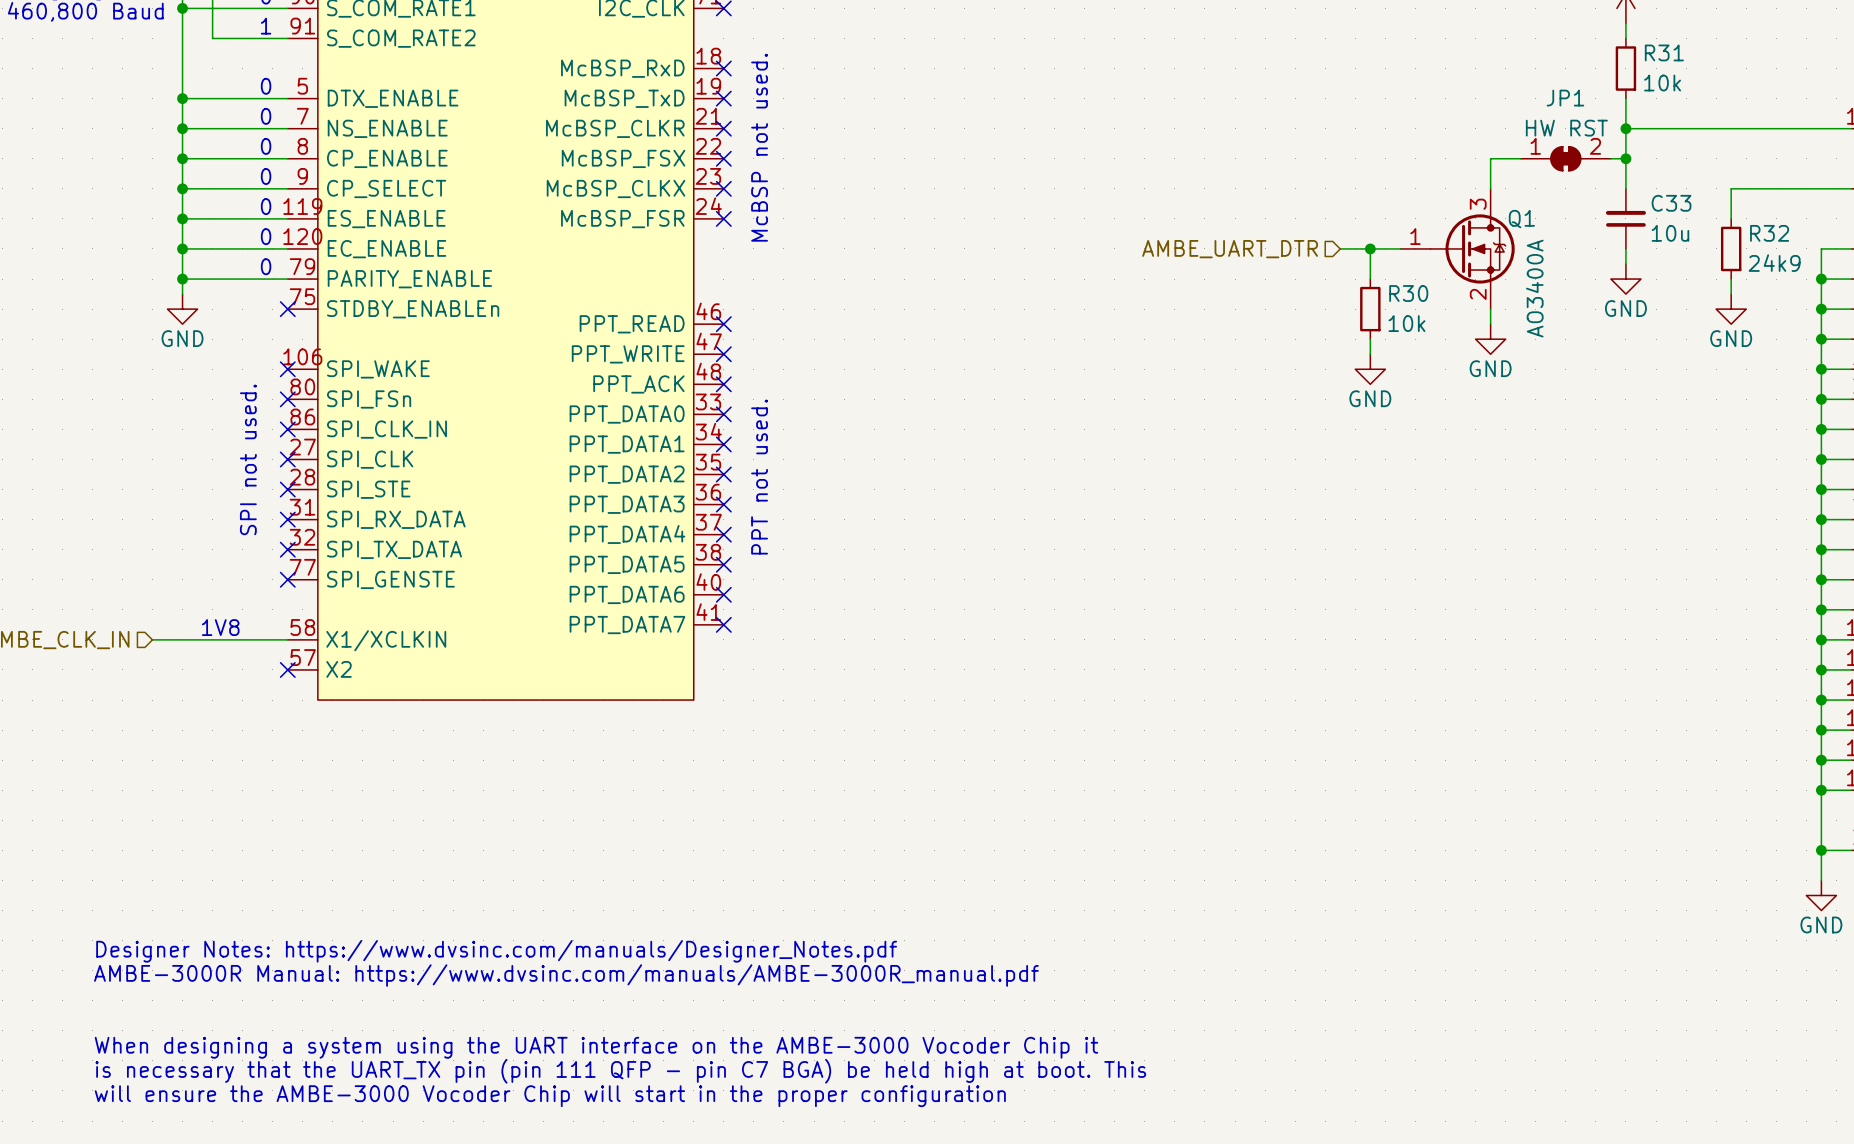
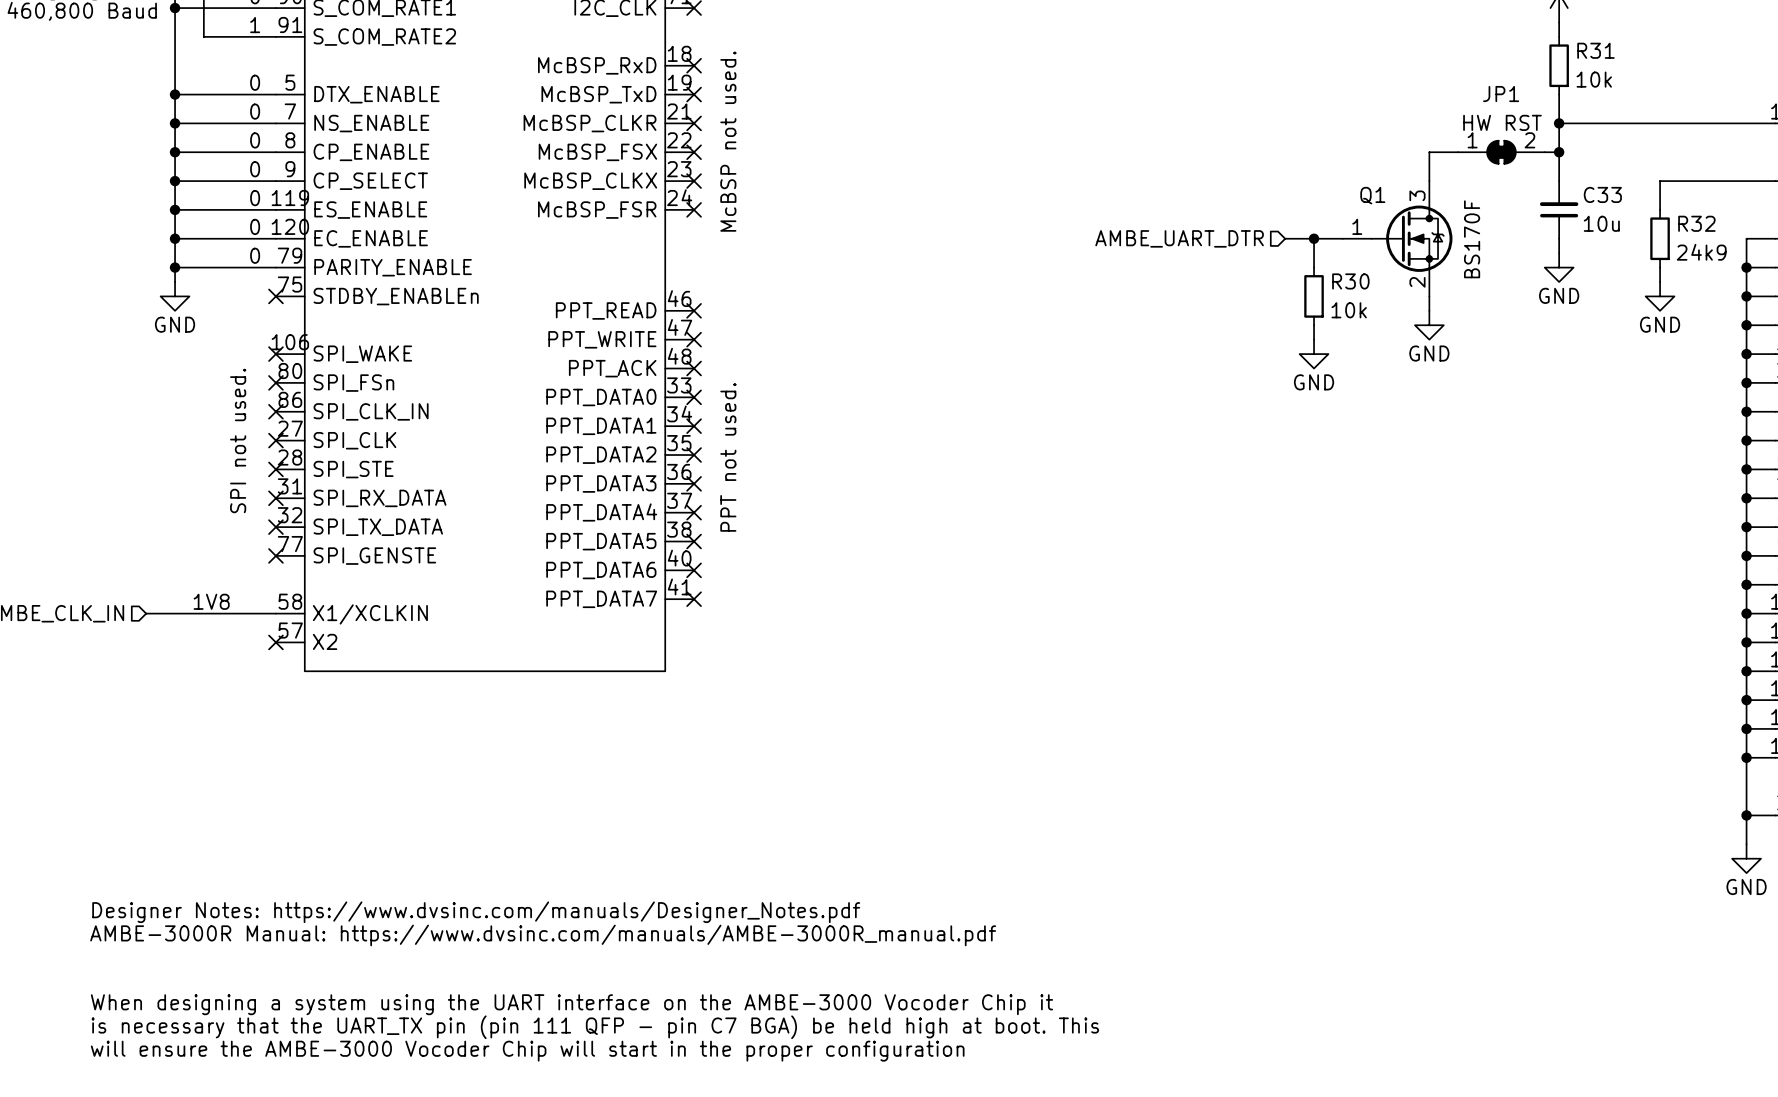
Q1 name position: Q1 (1521, 219) -> Q1 (1372, 195)
Q1 value: AO3400A (1534, 288) -> BS170F (1472, 239)

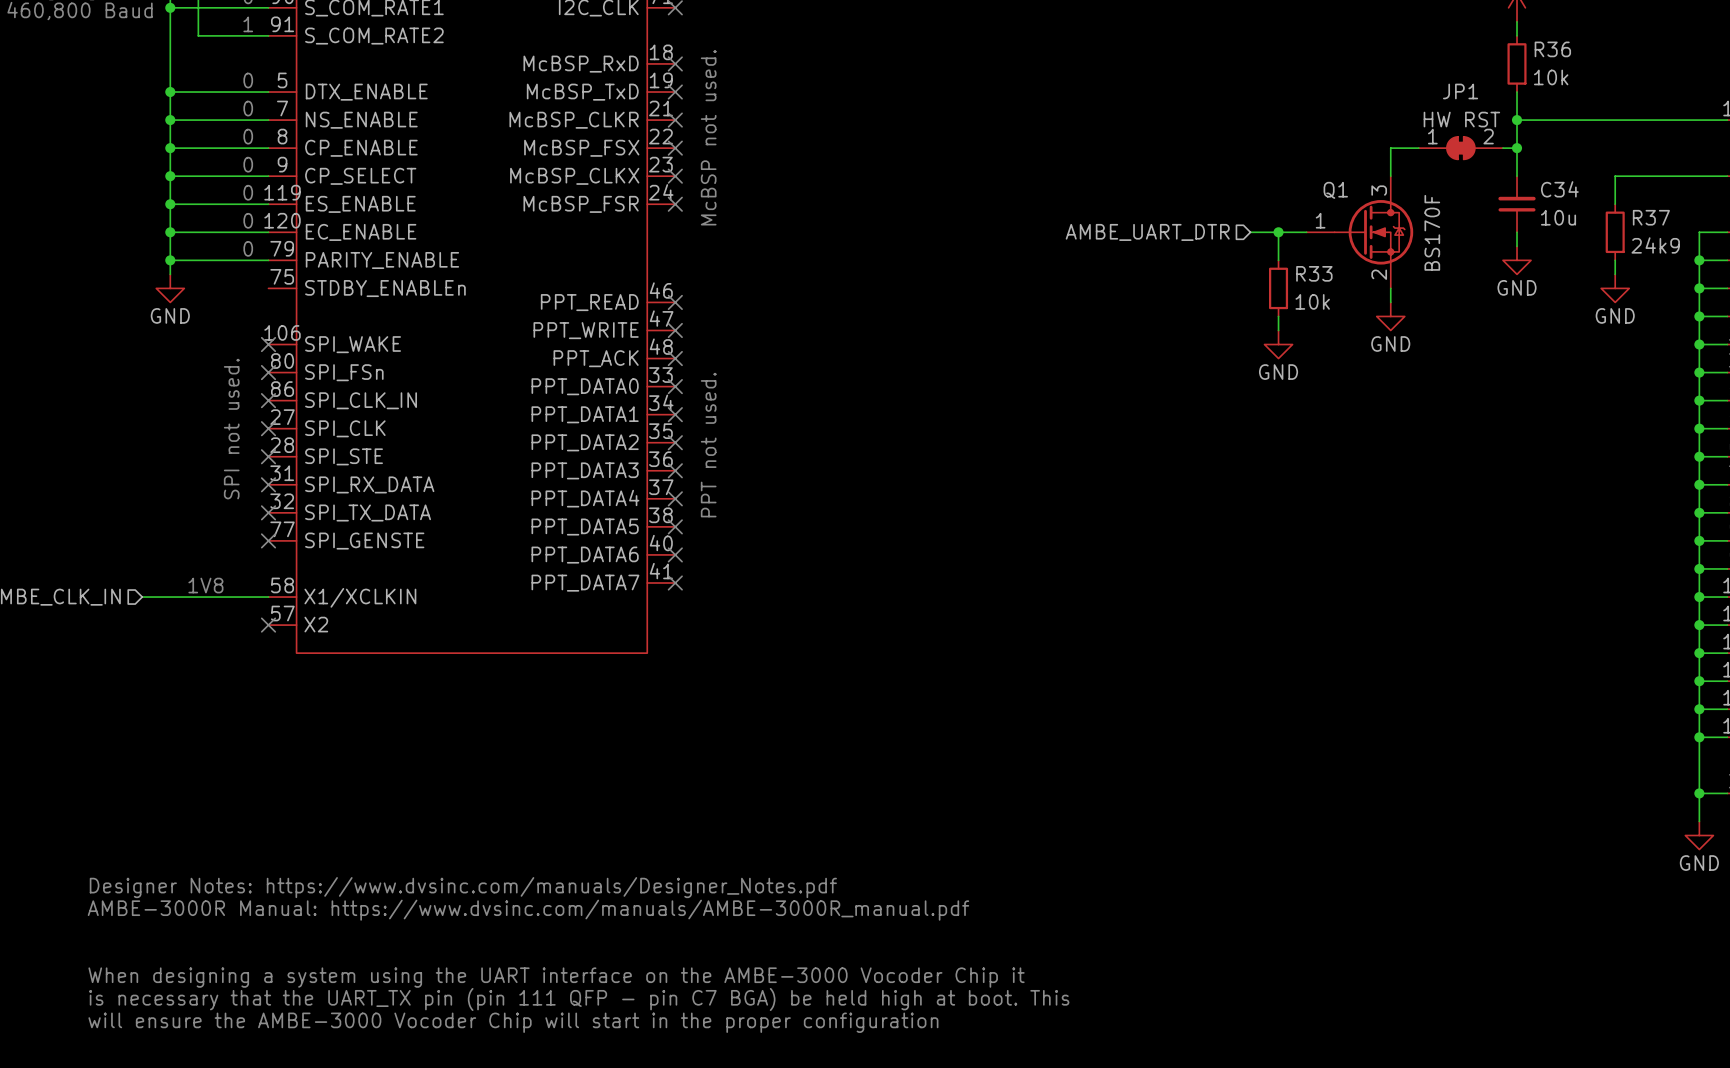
R31 name: R31 (1595, 50) -> R36 (1552, 49)
C33 name: C33 (1602, 194) -> C34 (1559, 189)
R32 name: R32 (1696, 223) -> R37 (1651, 217)
R30 name: R30 (1350, 281) -> R33 (1314, 273)
no-connect mark: (275, 296) -> none

